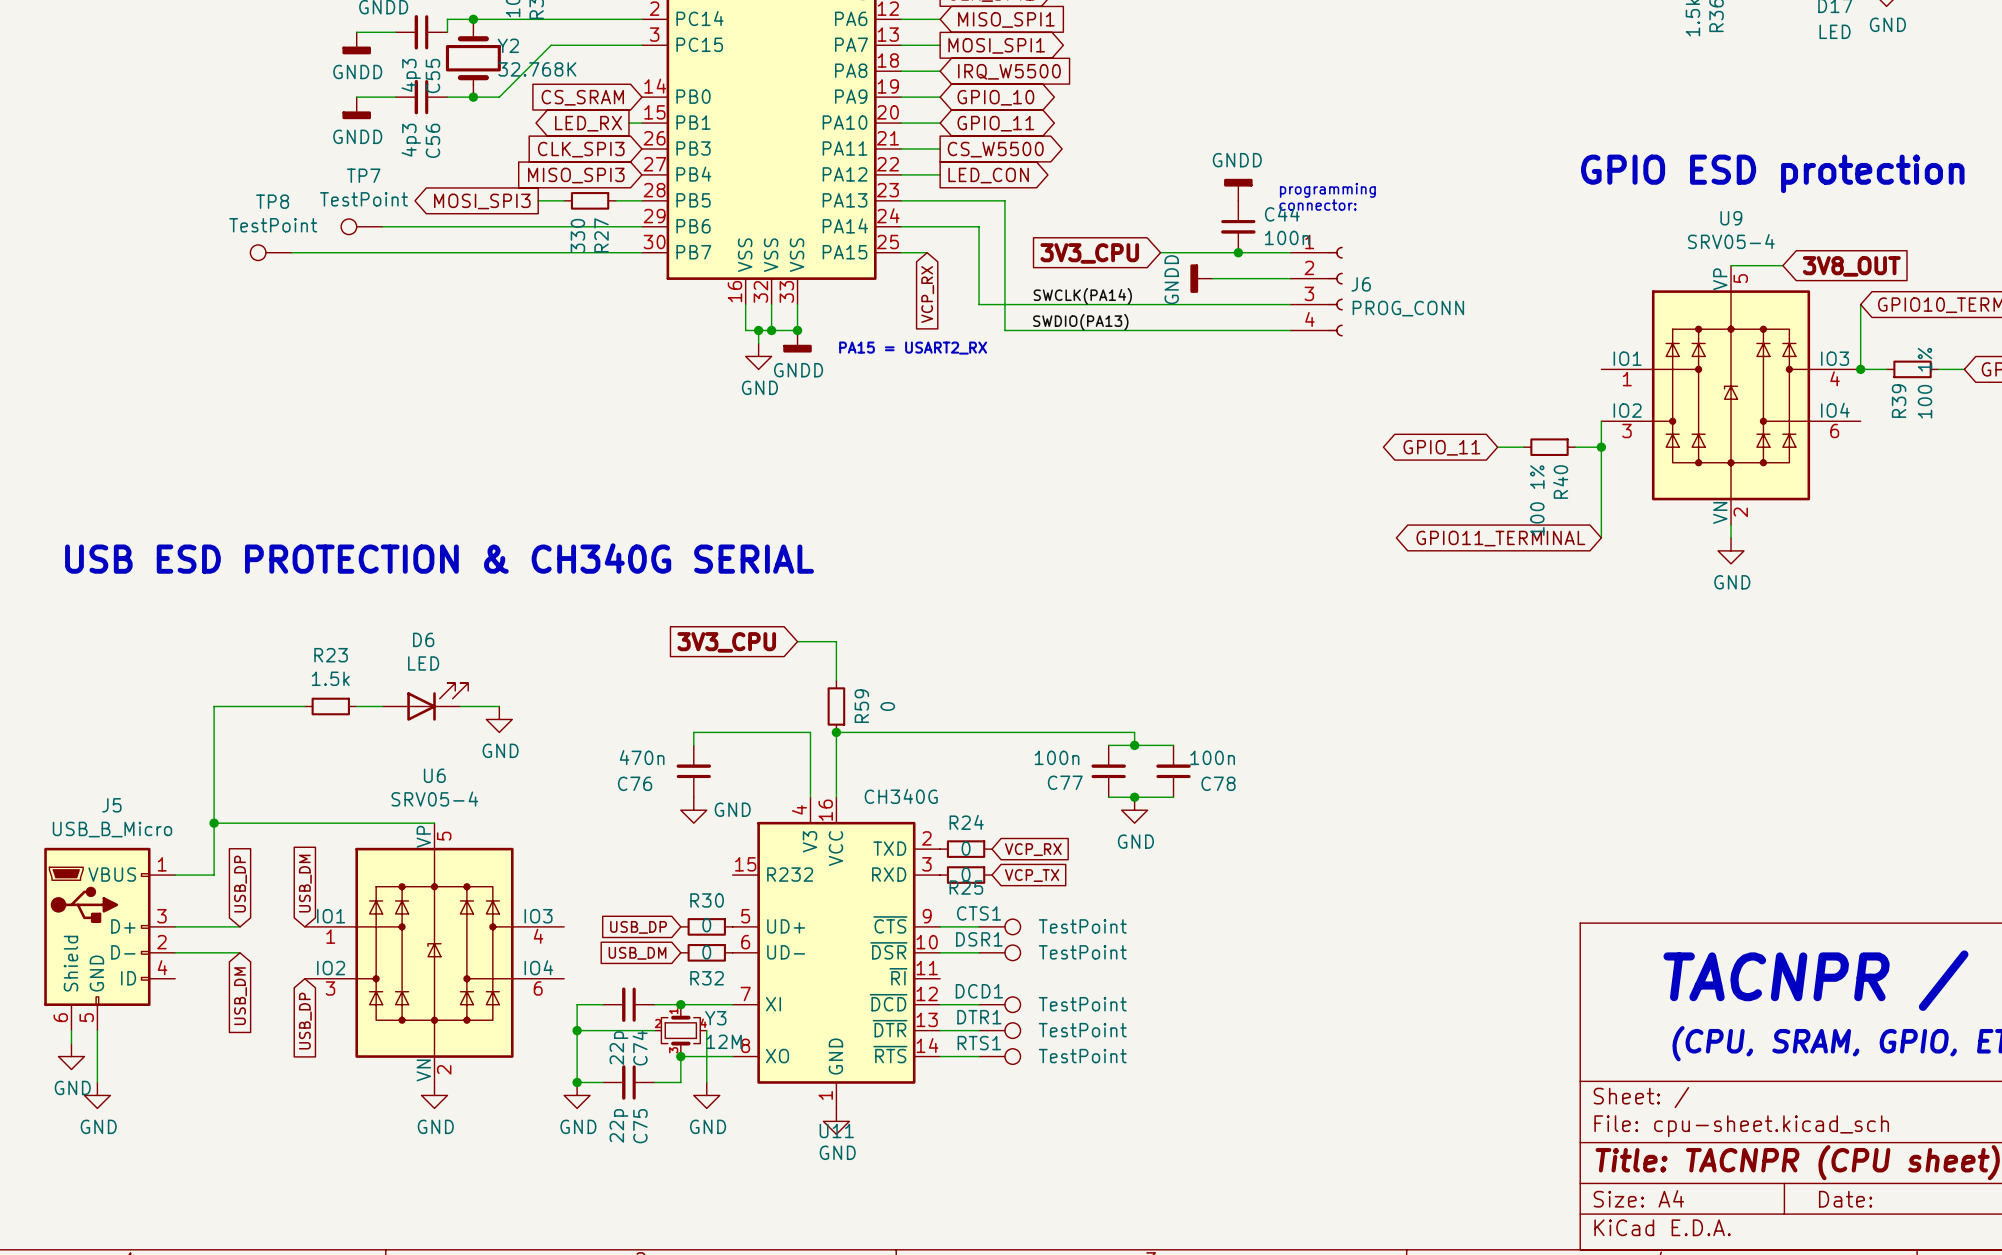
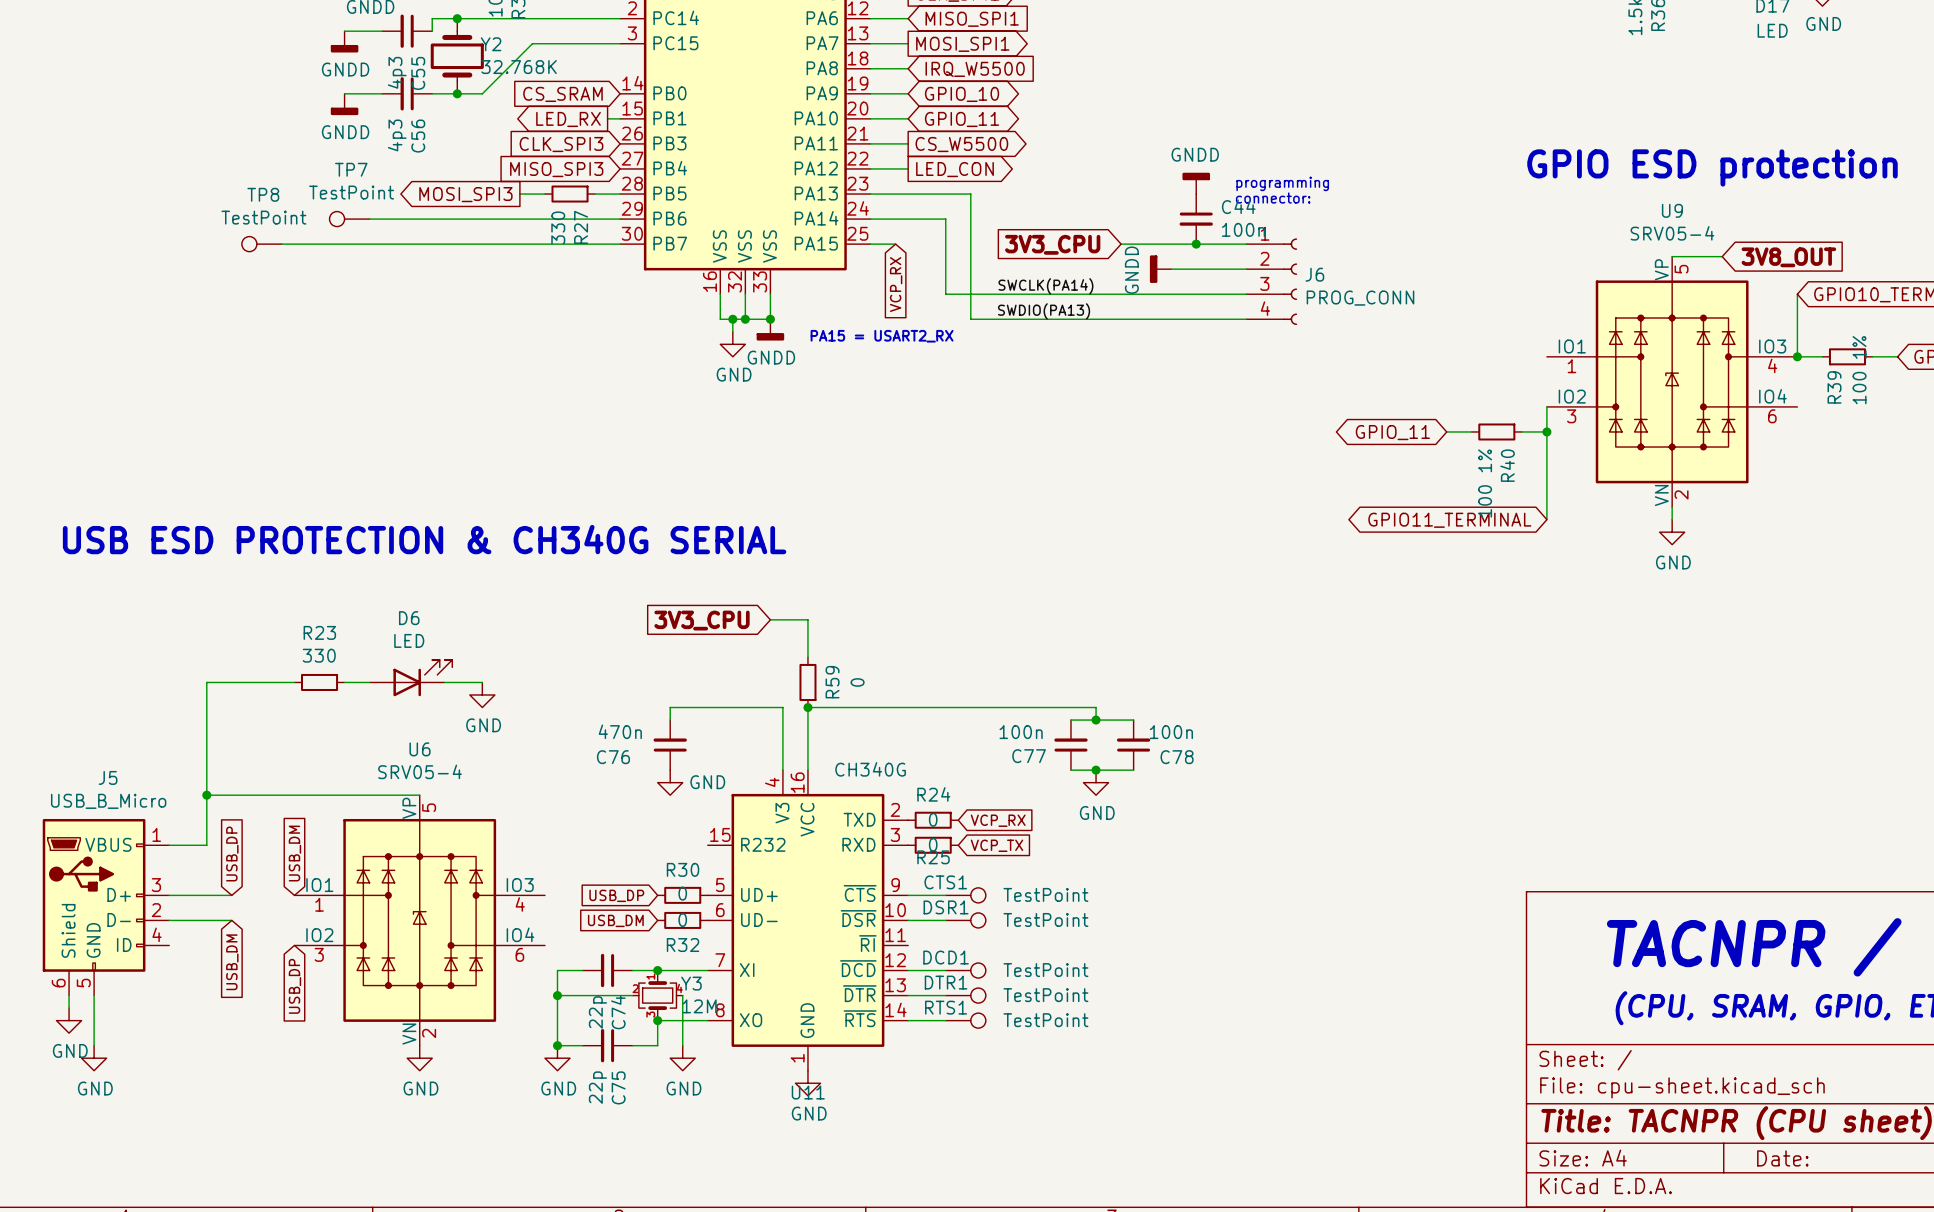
R23 value: 1.5k (330, 678) -> 330 (319, 655)

